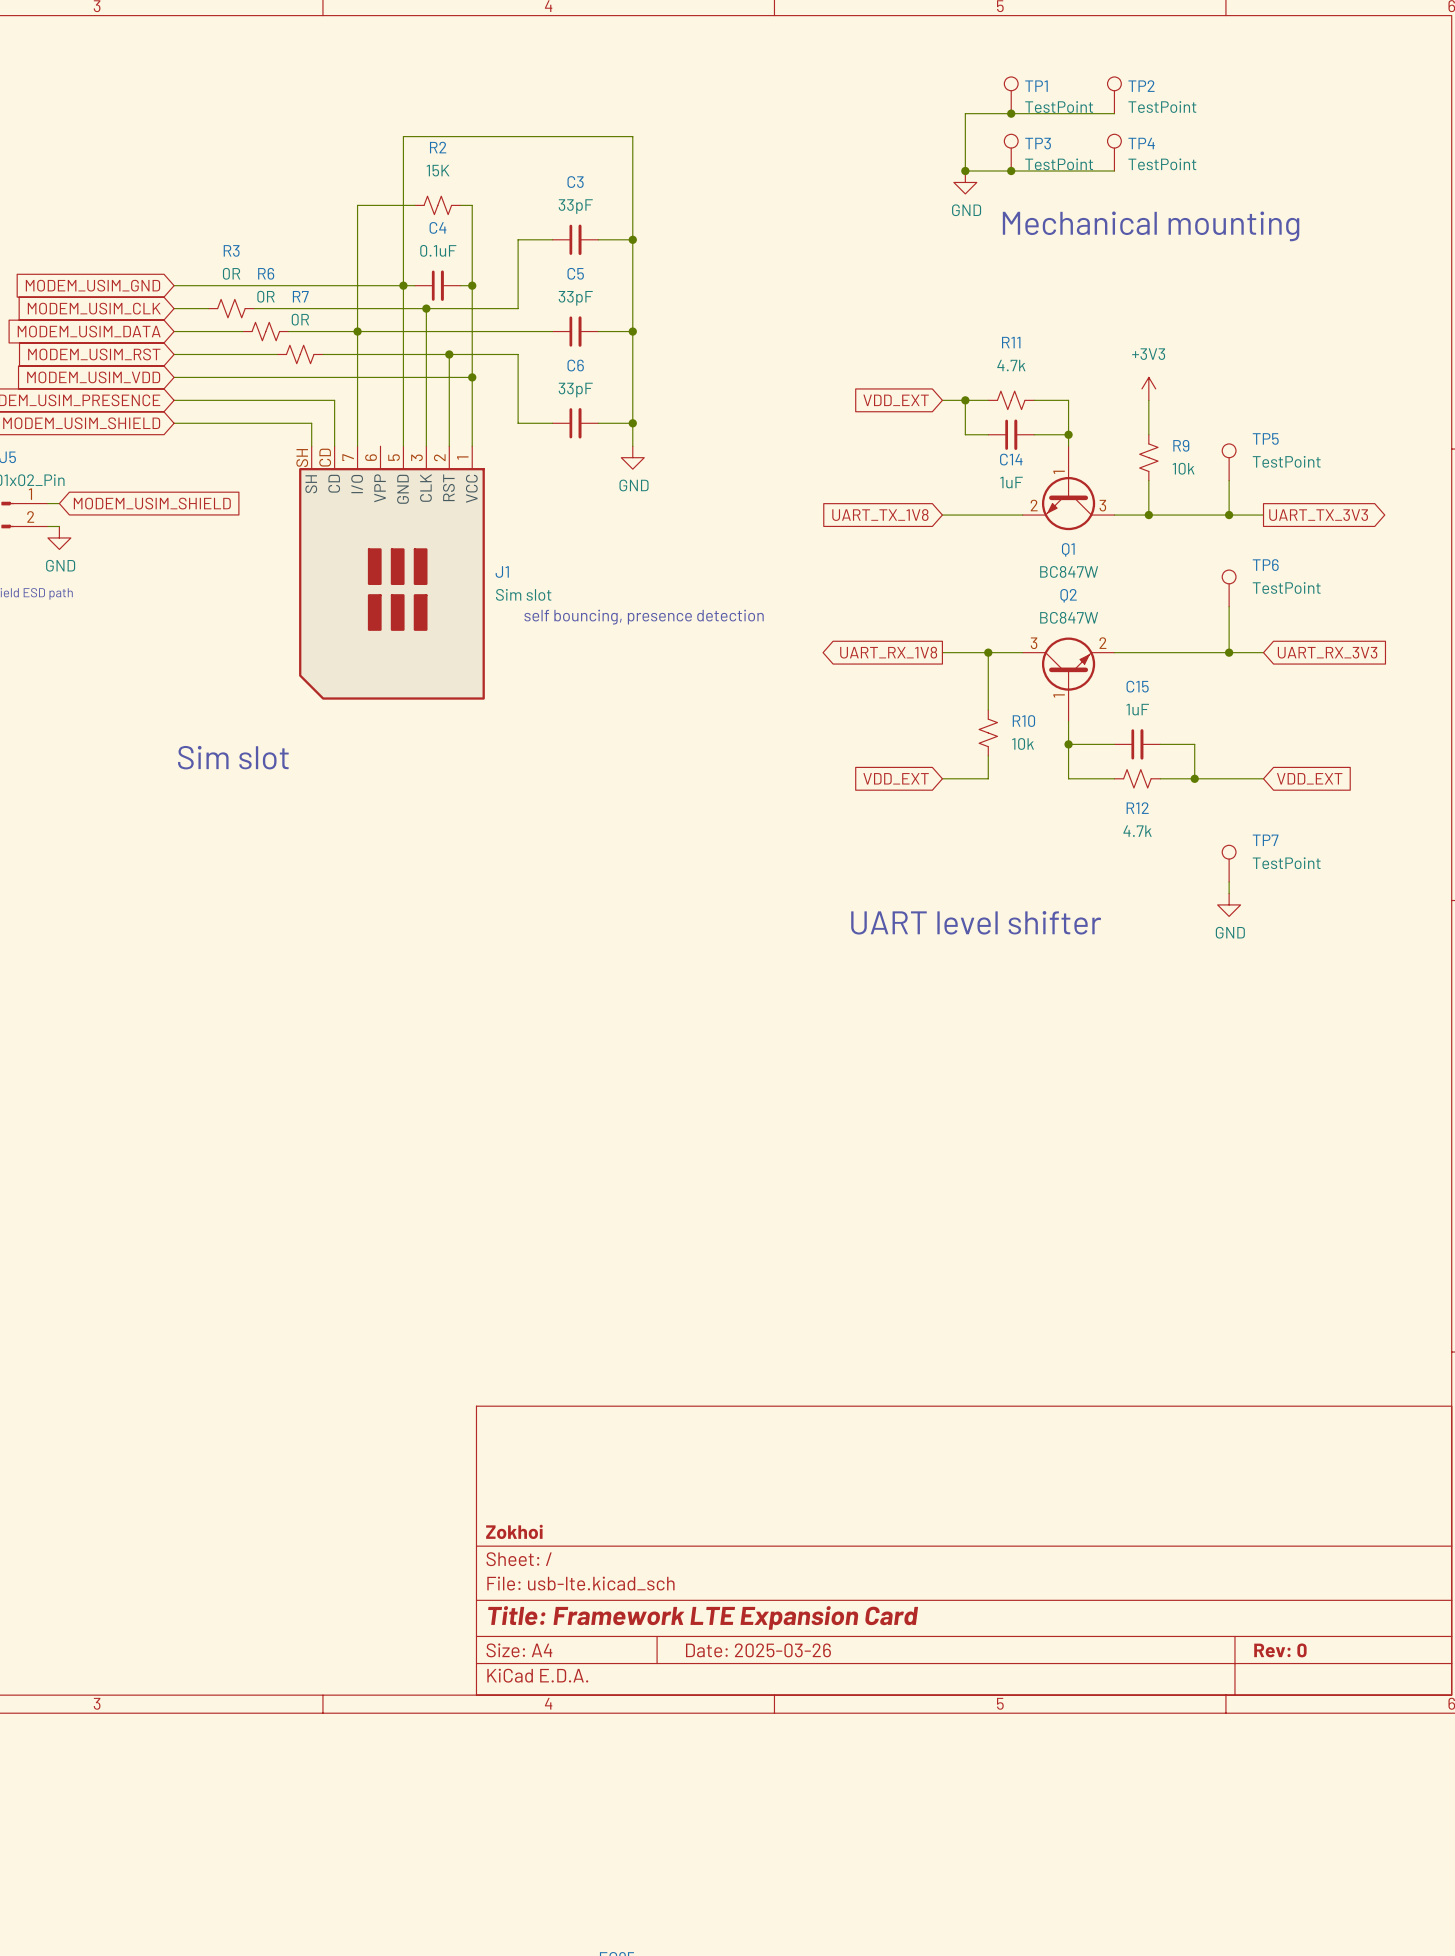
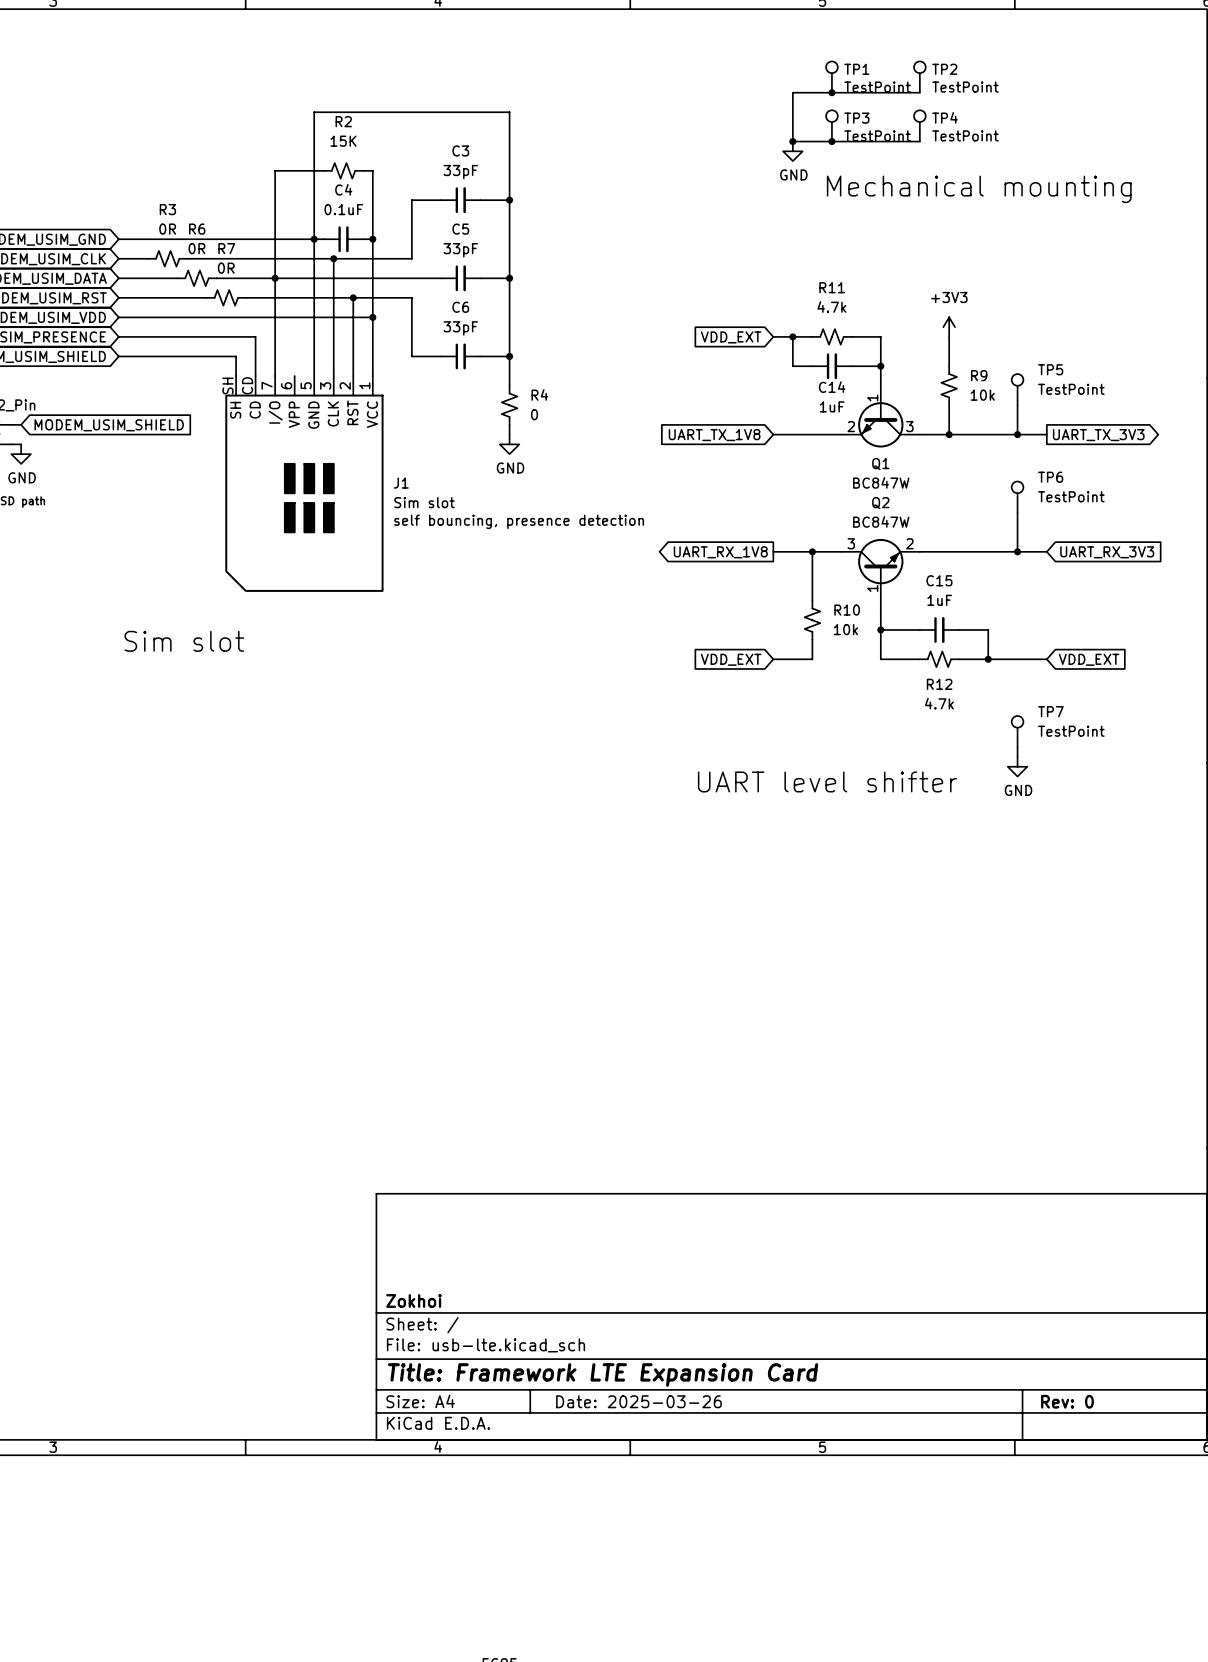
power symbol position: GND (632, 457) -> GND (509, 444)
R4: none -> 0 (509, 405)
wire: none -> (509, 424) (509, 434)

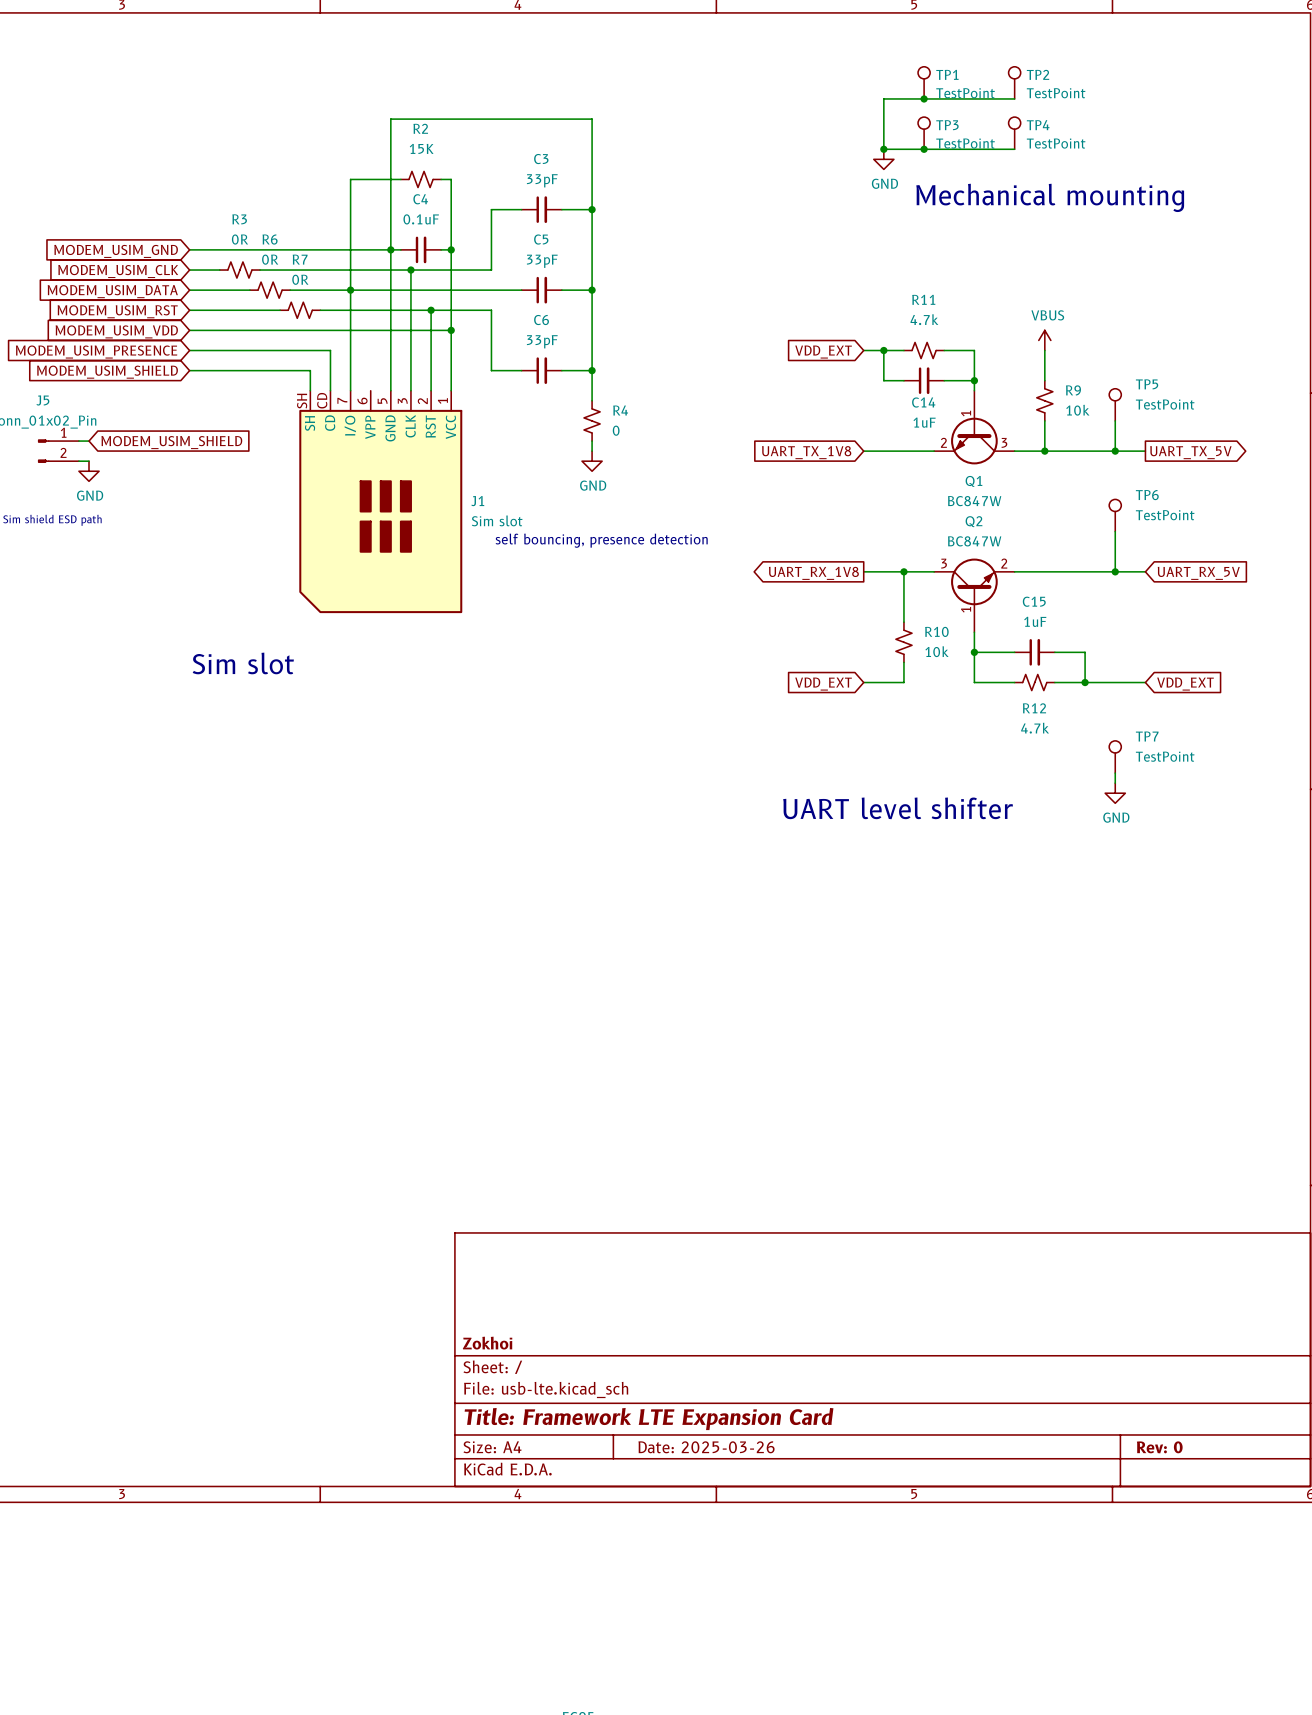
power symbol: +3V3 (949, 327) -> VBUS (1044, 340)
global label: UART_TX_3V3 (1098, 435) -> UART_TX_5V (1190, 452)
global label: UART_RX_3V3 (1107, 552) -> UART_RX_5V (1198, 573)

